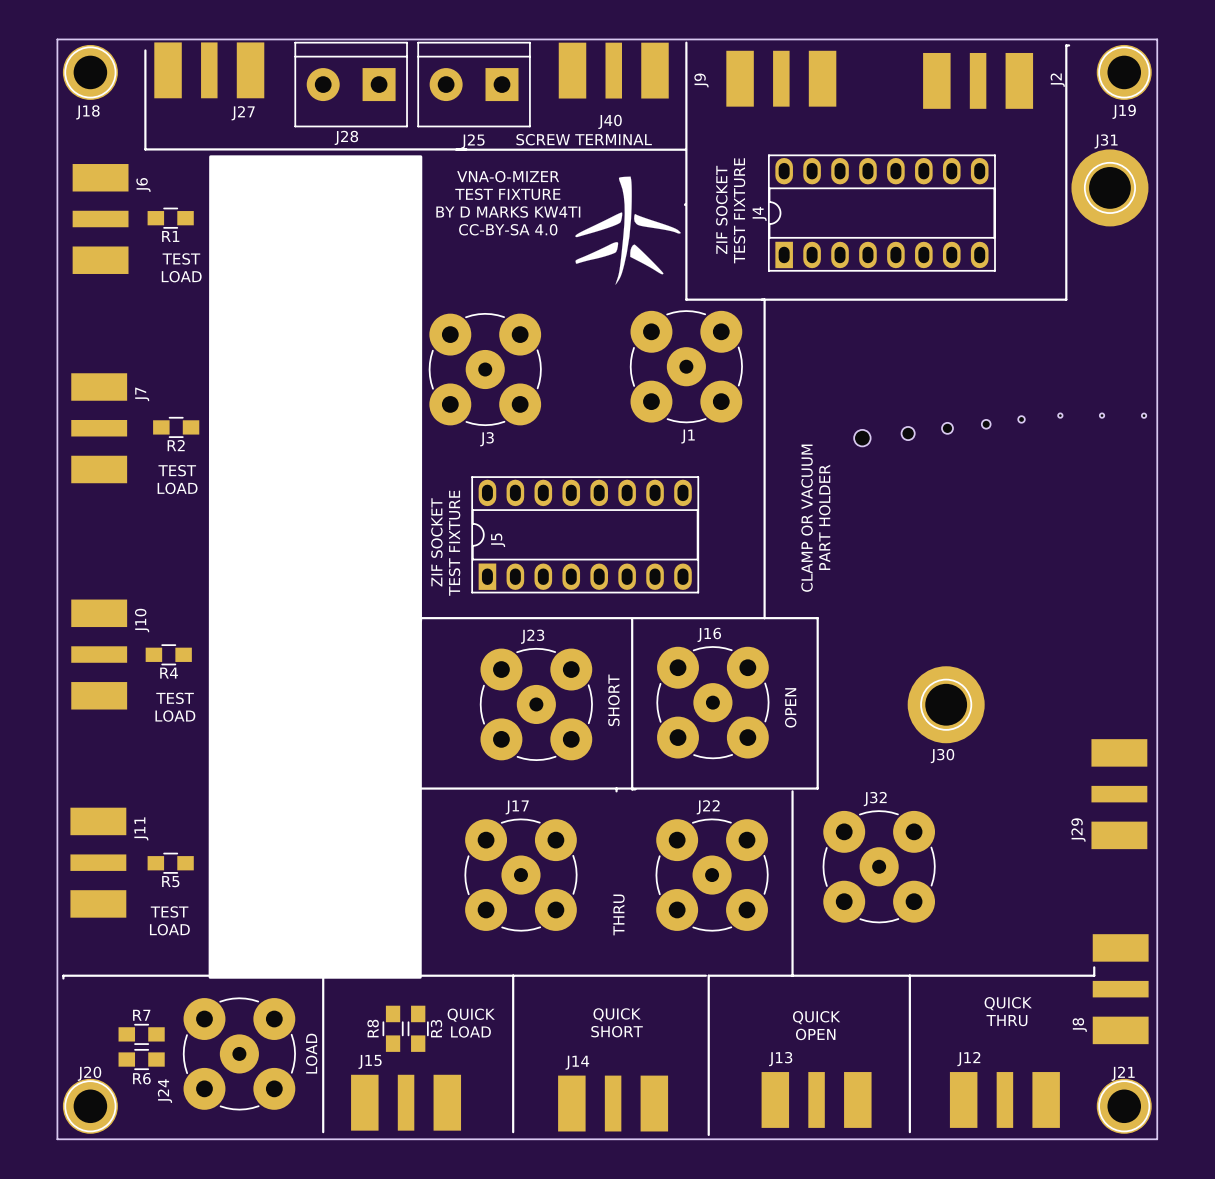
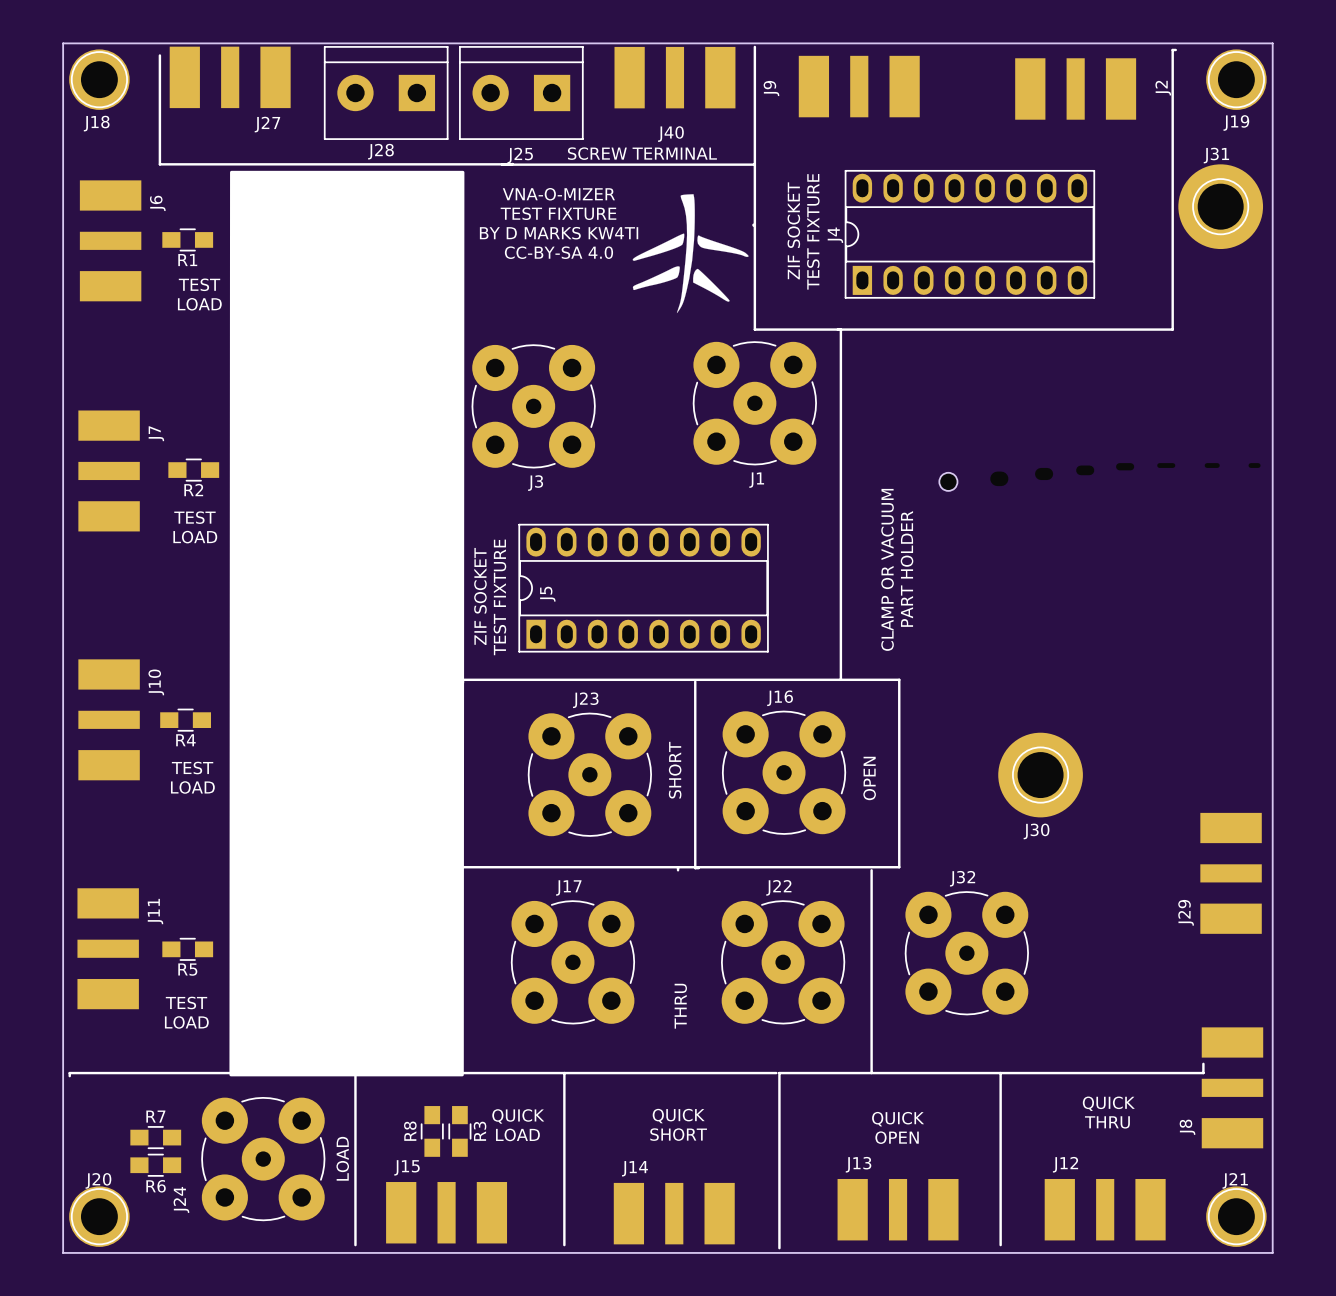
part footprint: [1058, 413, 1063, 418] -> [1157, 463, 1176, 468]
part footprint: [1099, 413, 1105, 418] -> [1204, 463, 1220, 468]
part footprint: [1141, 413, 1147, 418] -> [1248, 463, 1261, 468]
part footprint: [1018, 416, 1025, 423] -> [1116, 463, 1135, 471]
part footprint: [981, 419, 991, 429] -> [1076, 465, 1095, 476]
part footprint: [942, 422, 954, 434] -> [1035, 467, 1054, 481]
part footprint: [901, 426, 915, 441] -> [990, 471, 1009, 487]

